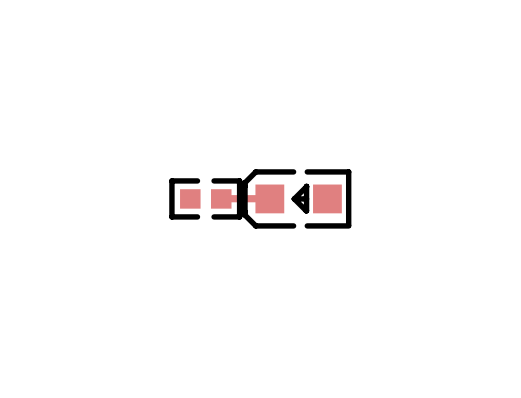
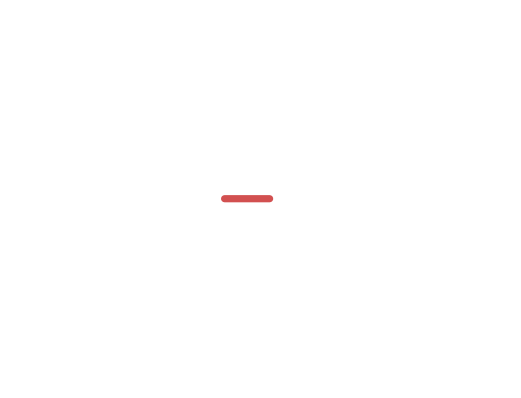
part: (205, 198) -> none
part: (296, 198) -> none

